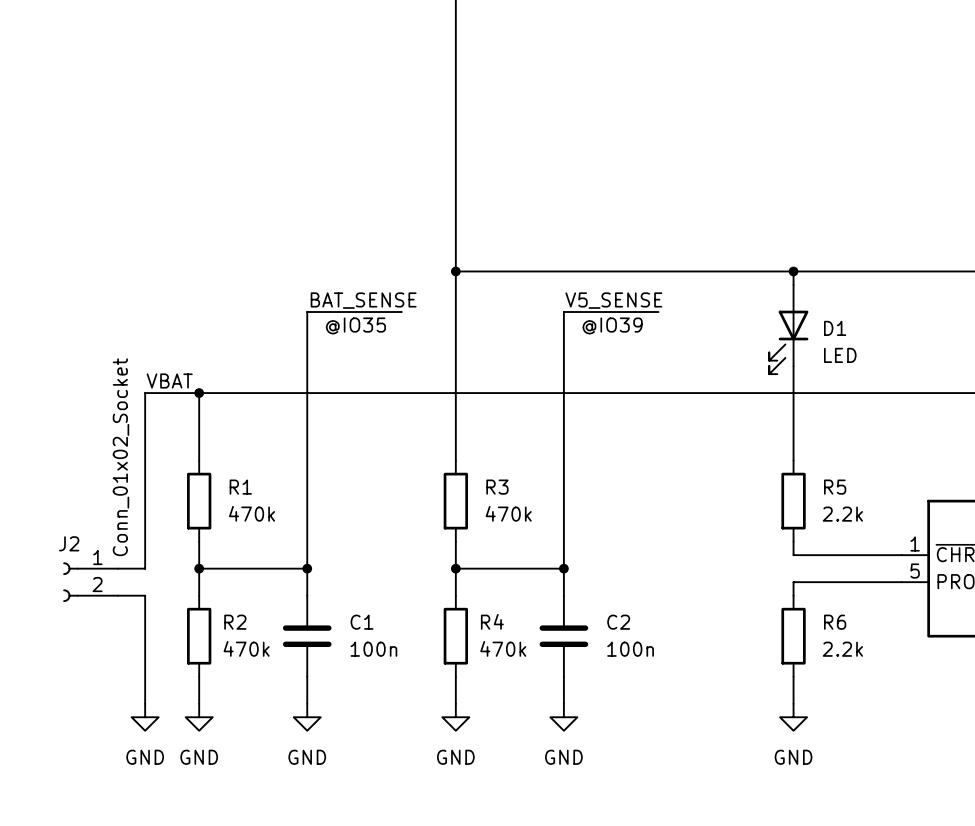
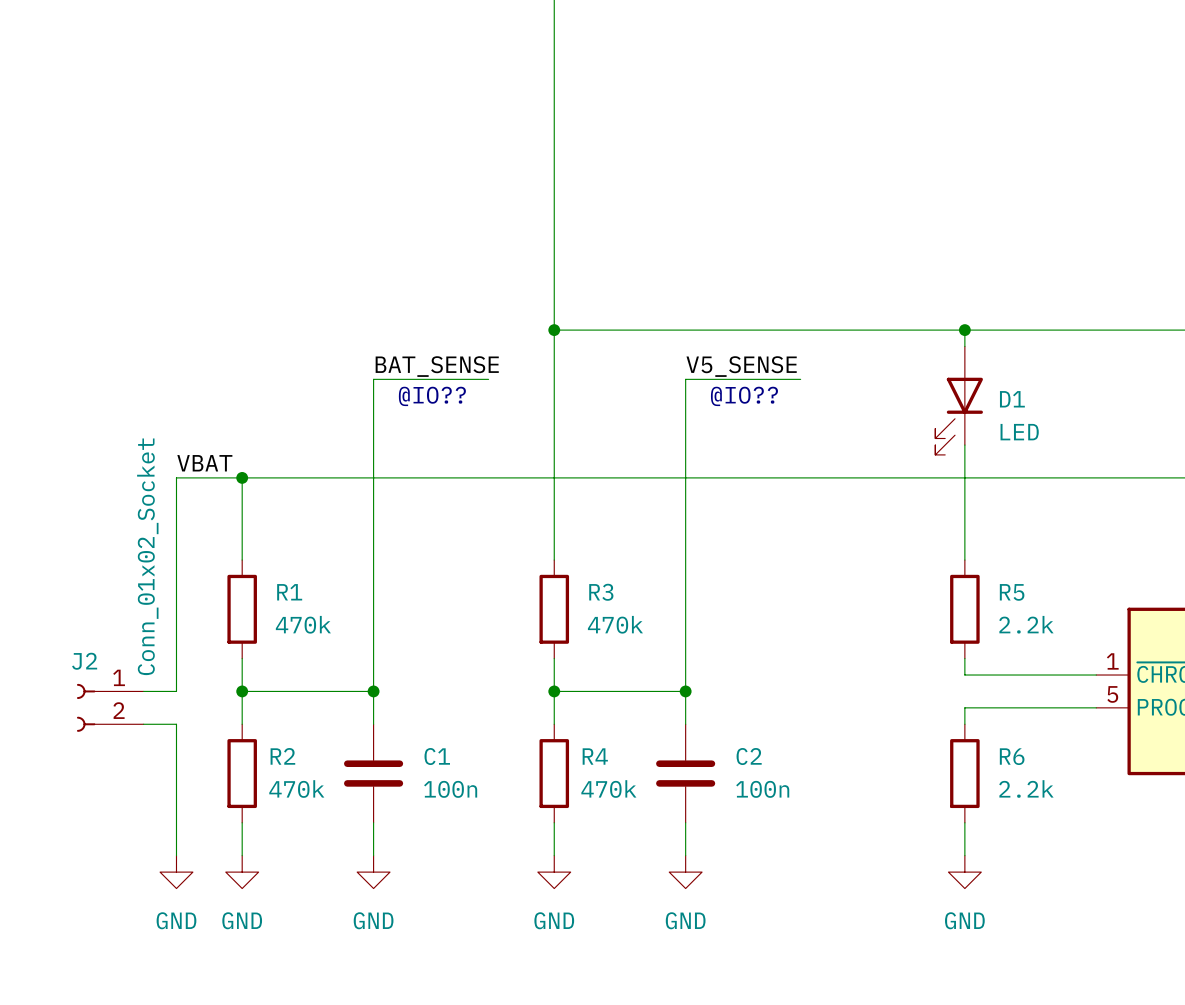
text: @IO35 (355, 326) -> @IO?? (432, 396)
text: @IO39 (612, 326) -> @IO?? (744, 396)

